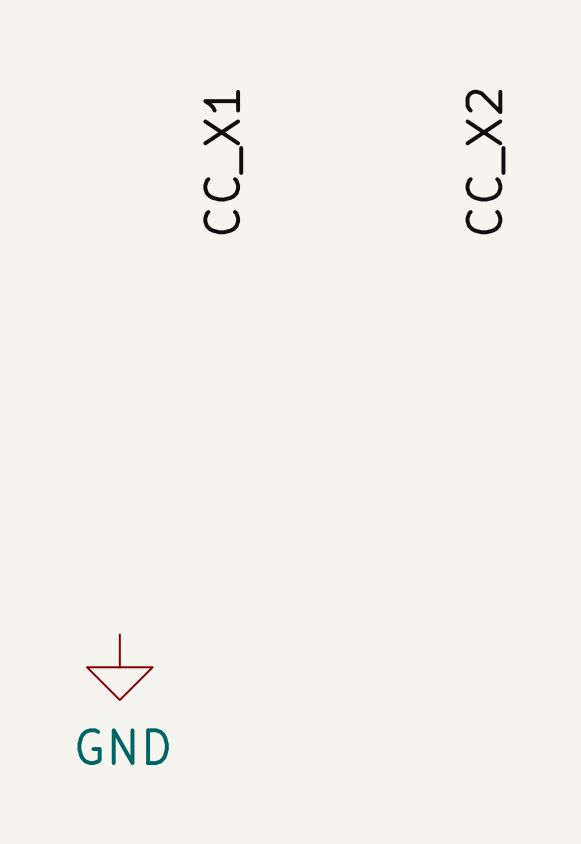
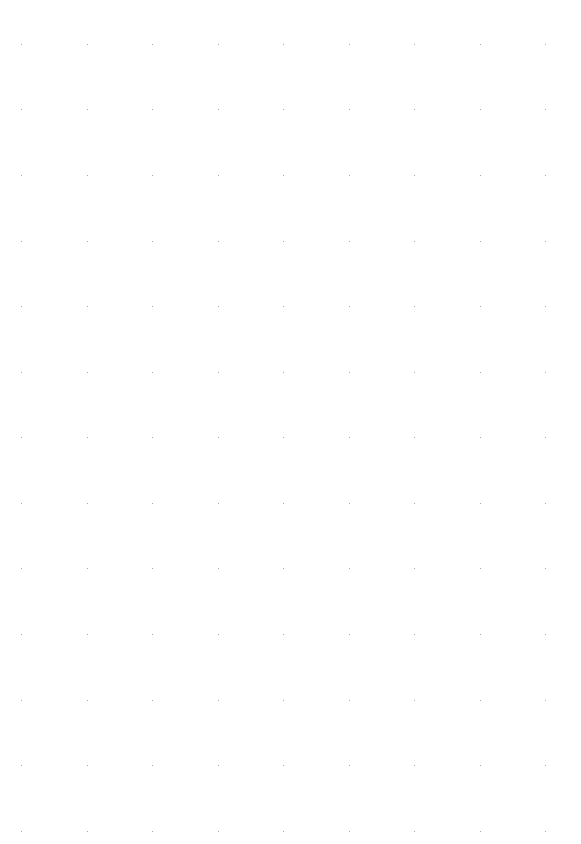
label: CC_X1 (223, 162) -> none
label: CC_X2 (485, 162) -> none
power symbol: GND (119, 667) -> none

